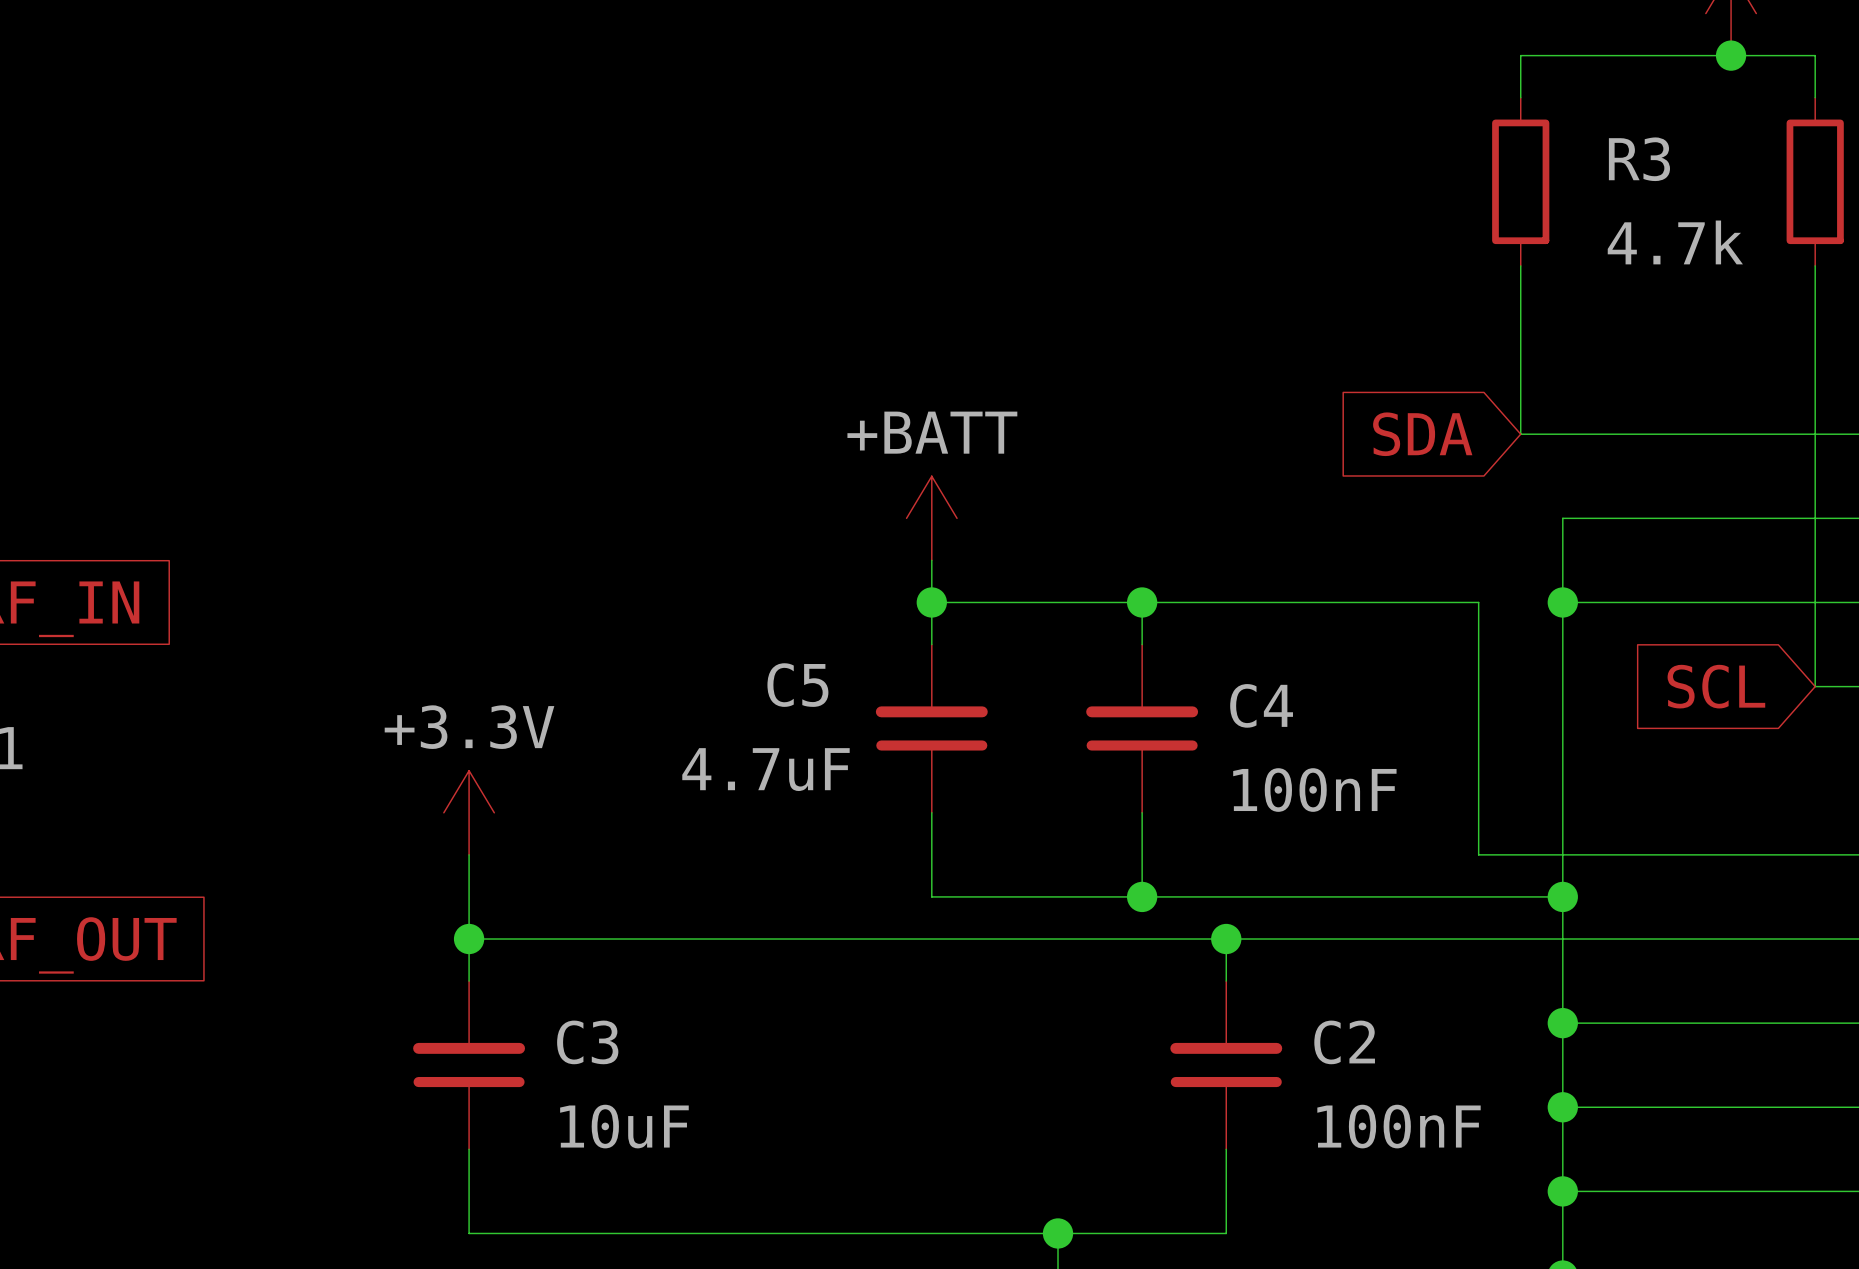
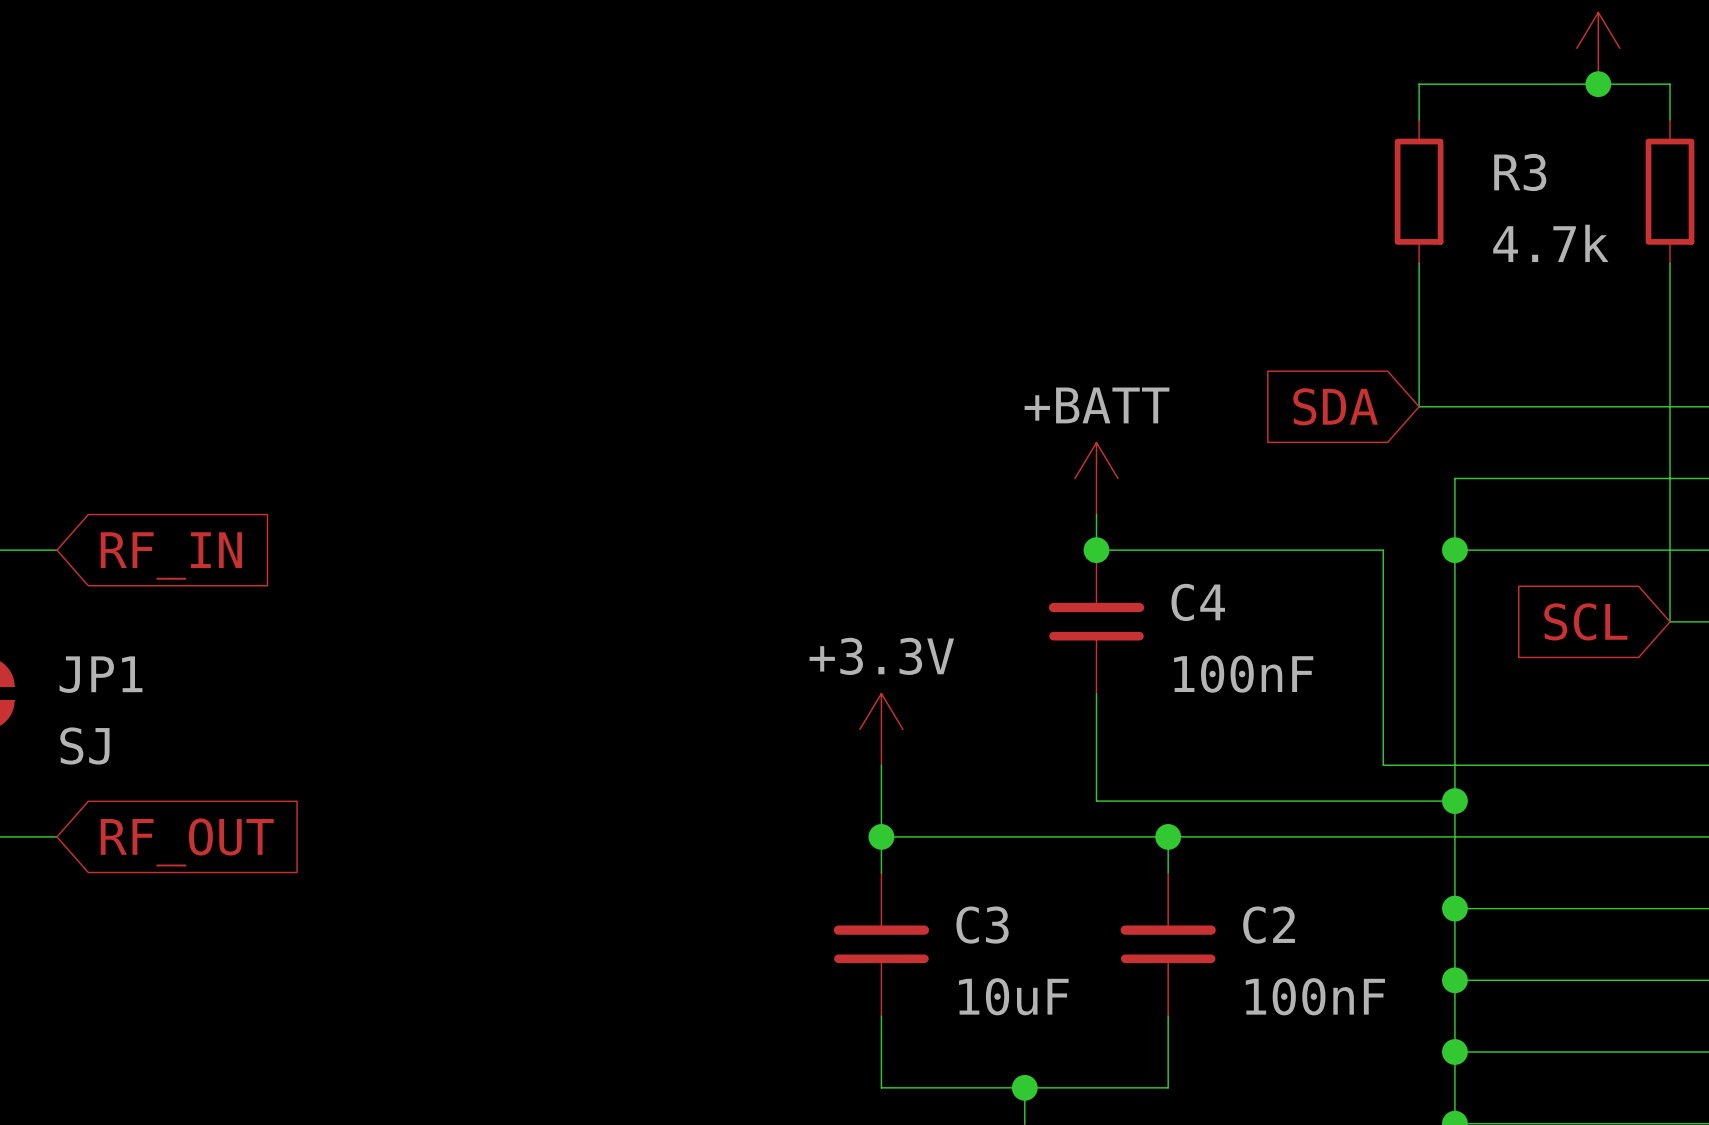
power symbol position: +BATT (931, 518) -> +BATT (1096, 478)
wire: (931, 560) (931, 644) -> none
wire: none -> (1096, 514) (1096, 550)
wire: (931, 602) (1142, 602) (1142, 644) -> none
junction: (931, 602) -> none
C5: 4.7uF (931, 728) -> none
C4 position: (1142, 728) -> (1096, 621)
power symbol position: +3.3V (469, 812) -> +3.3V (881, 729)
wire: (931, 812) (931, 896) (1142, 896) -> none
wire: (469, 854) (469, 981) -> (881, 765) (881, 872)
junction: (1142, 896) -> none
wire: (469, 939) (889, 939) -> none
junction: (469, 939) -> none
junction: none -> (881, 836)
C3 position: (469, 1065) -> (881, 944)
wire: (469, 1149) (469, 1233) (889, 1233) -> (881, 1016) (881, 1087)

